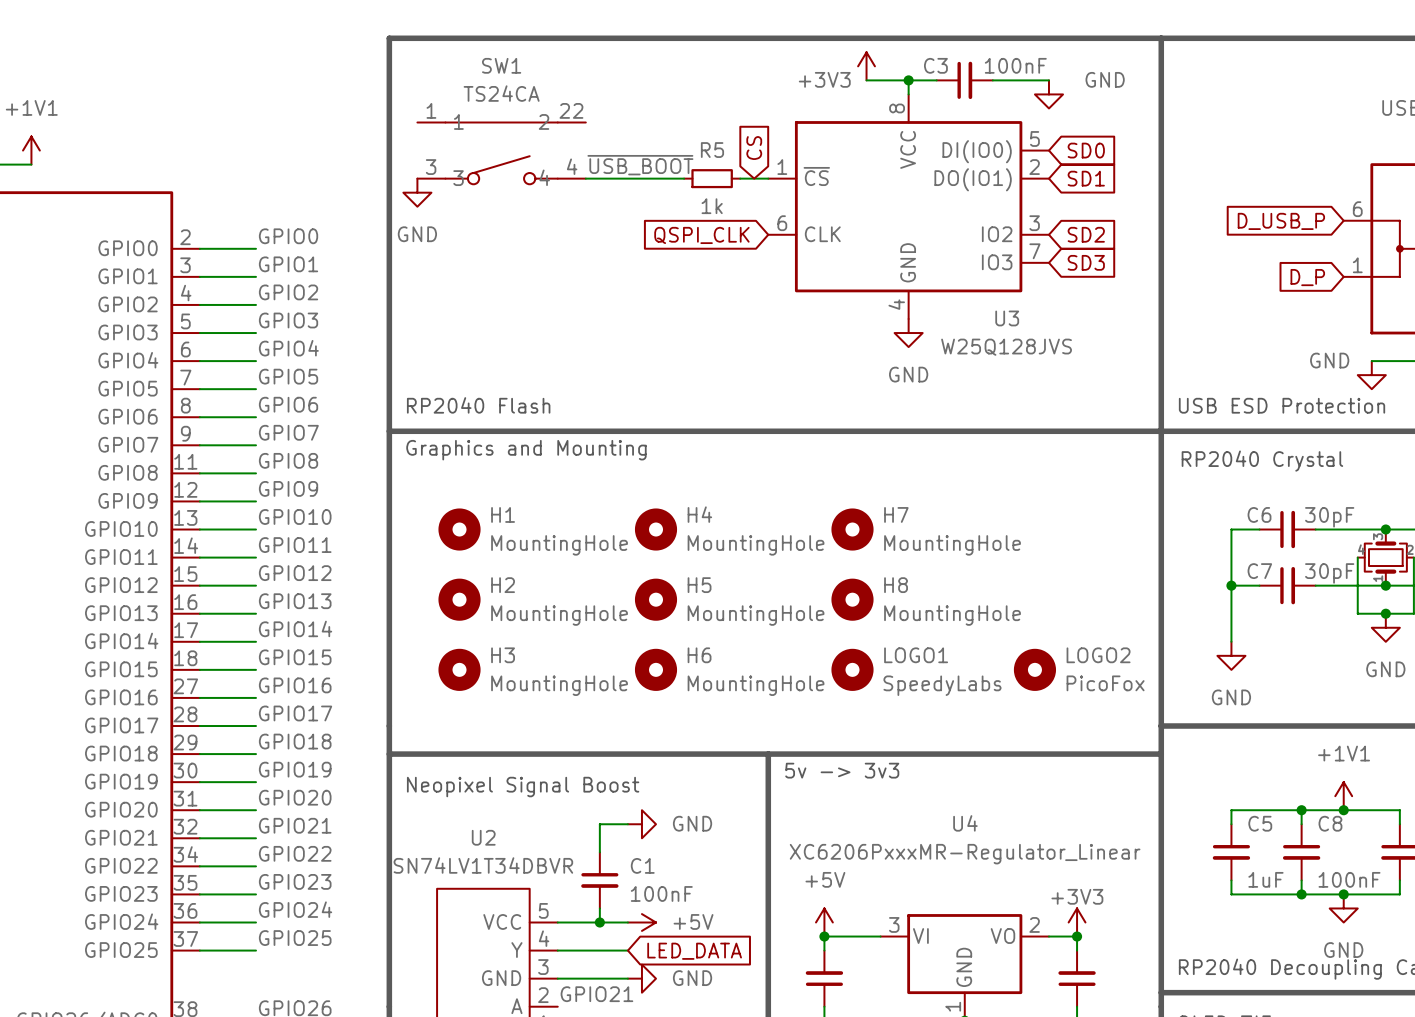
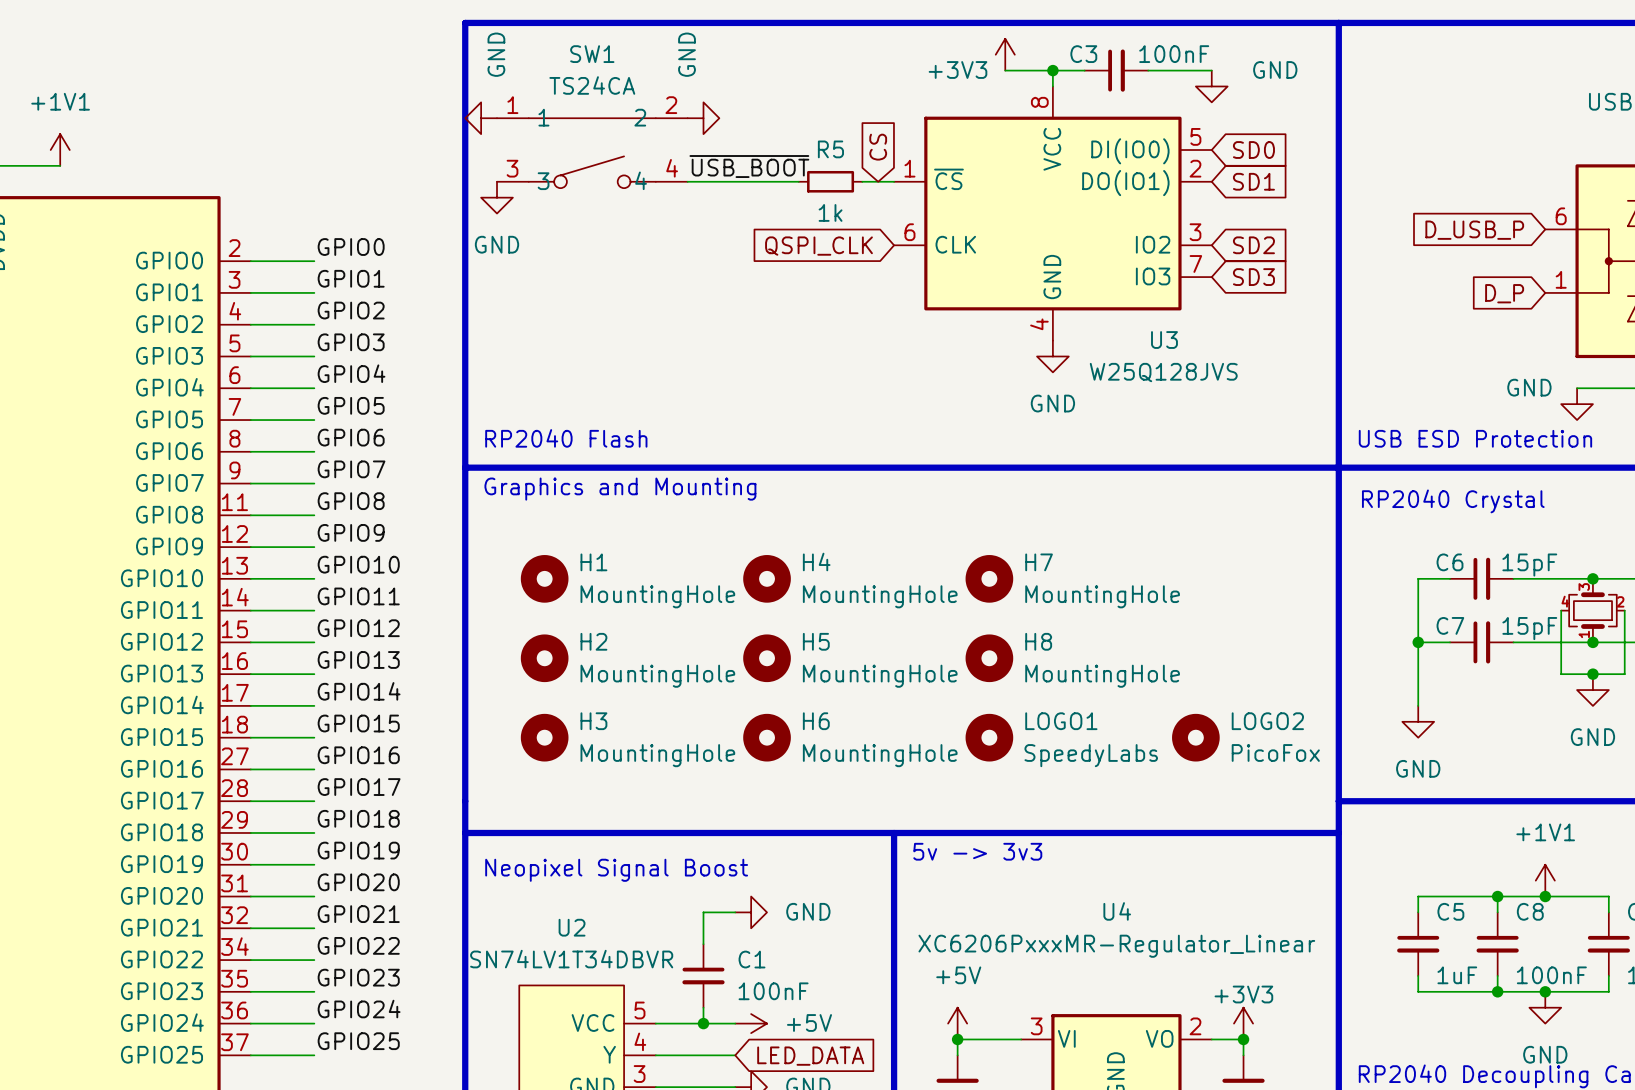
SW1 pin number: 22 (571, 110) -> 2 (671, 105)
power symbol: none -> GND (481, 118)
power symbol: none -> GND (703, 118)
C6 value: 30pF (1329, 517) -> 15pF (1529, 565)
C7 value: 30pF (1329, 573) -> 15pF (1529, 628)

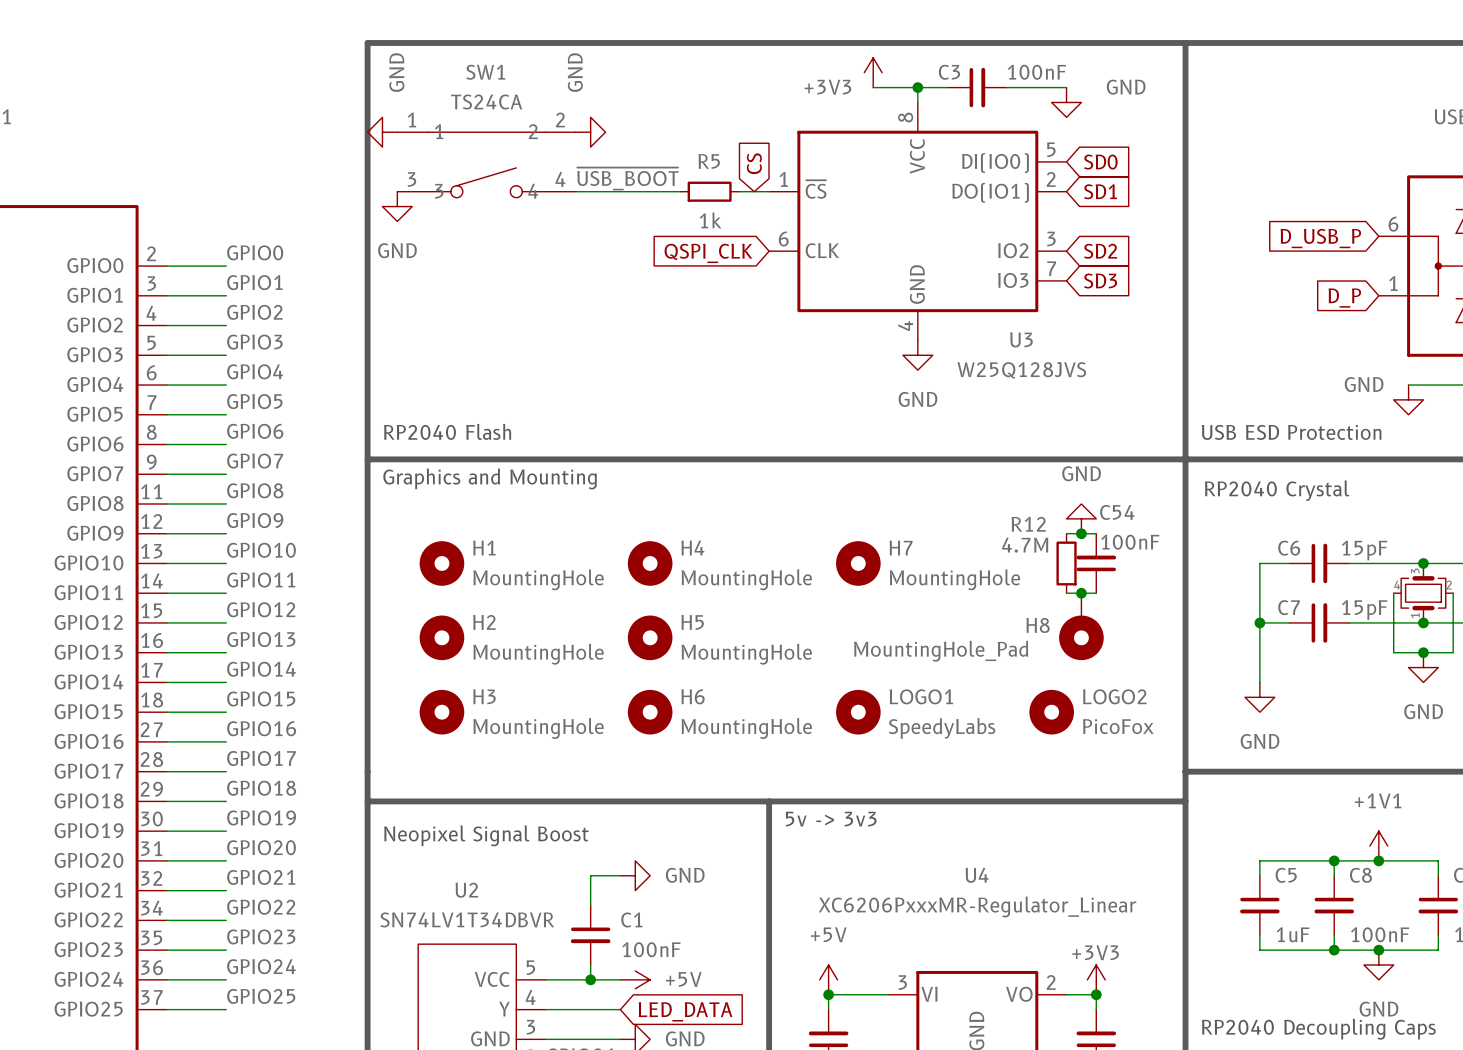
power symbol: none -> GND (1081, 518)
wire: none -> (1066, 533) (1096, 533)
junction: none -> (1081, 533)
R12: none -> 4.7M (1066, 563)
C54: none -> 100nF (1096, 563)
wire: none -> (1066, 593) (1096, 593)
junction: none -> (1081, 593)
H8 symbol: [965, 634, 1014, 683] -> [1059, 593, 1104, 661]
H8 name position: H8 (1038, 641) -> H8 (1038, 625)
H8 value: MountingHole (1102, 676) -> MountingHole_Pad (941, 651)

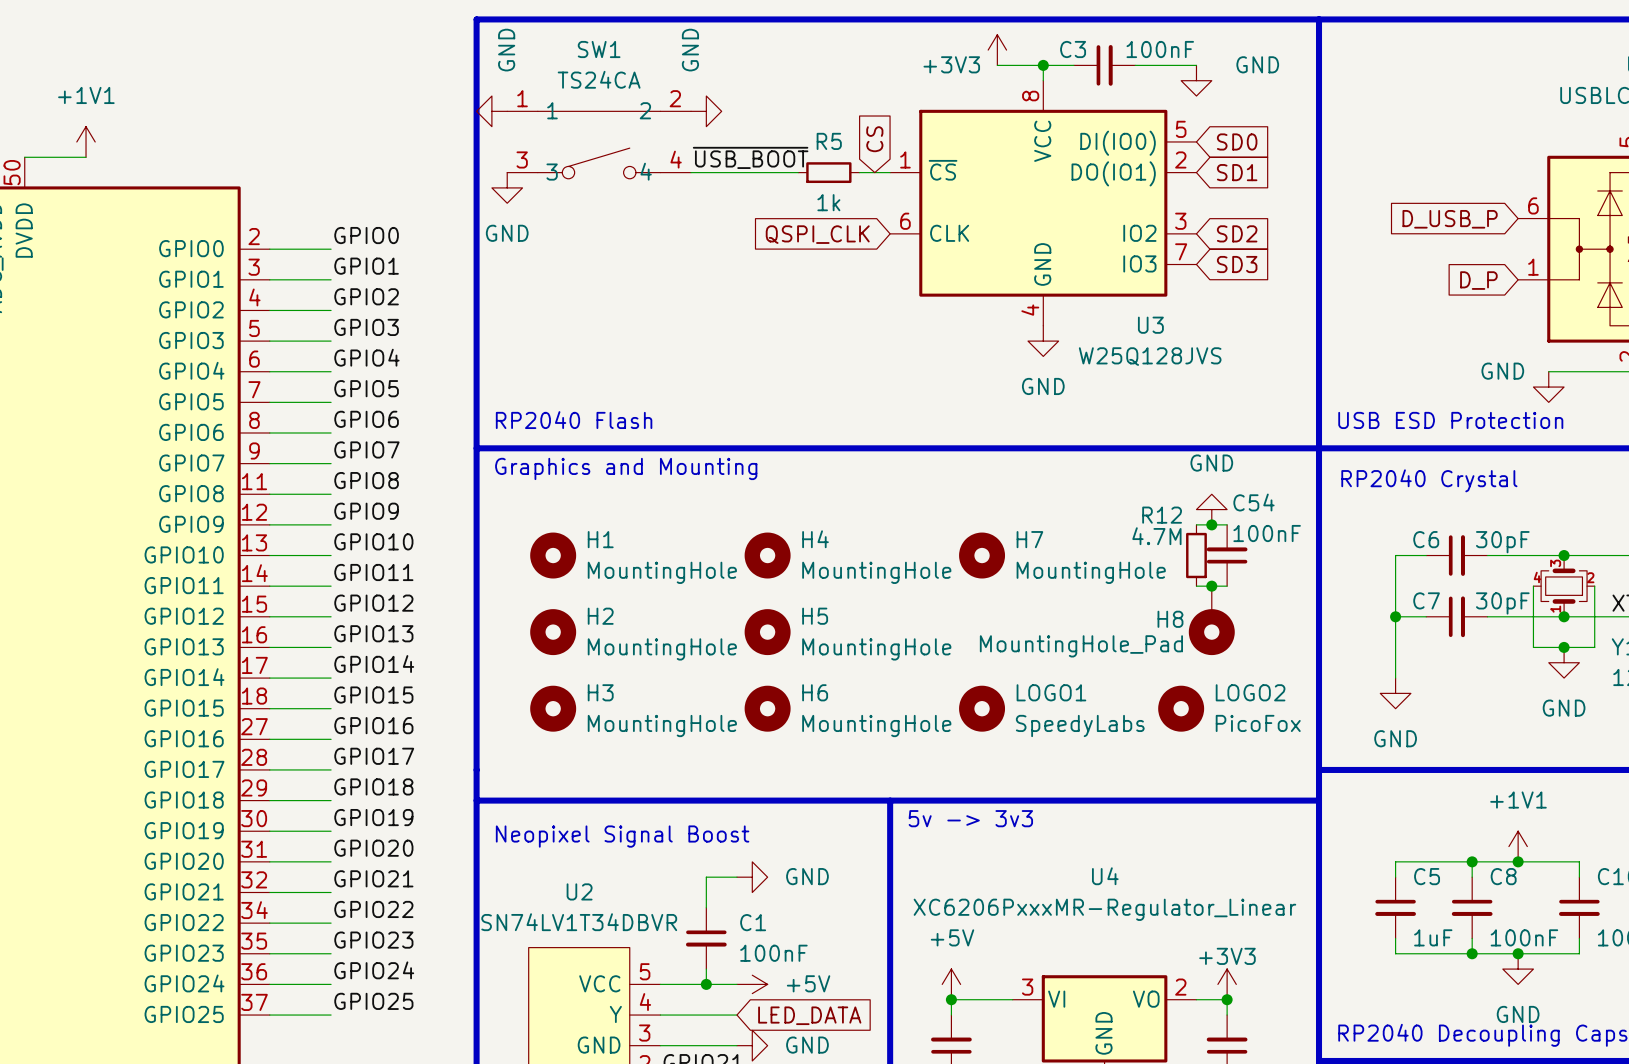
C6 value: 15pF (1364, 550) -> 30pF (1502, 542)
C7 value: 15pF (1364, 609) -> 30pF (1502, 603)

